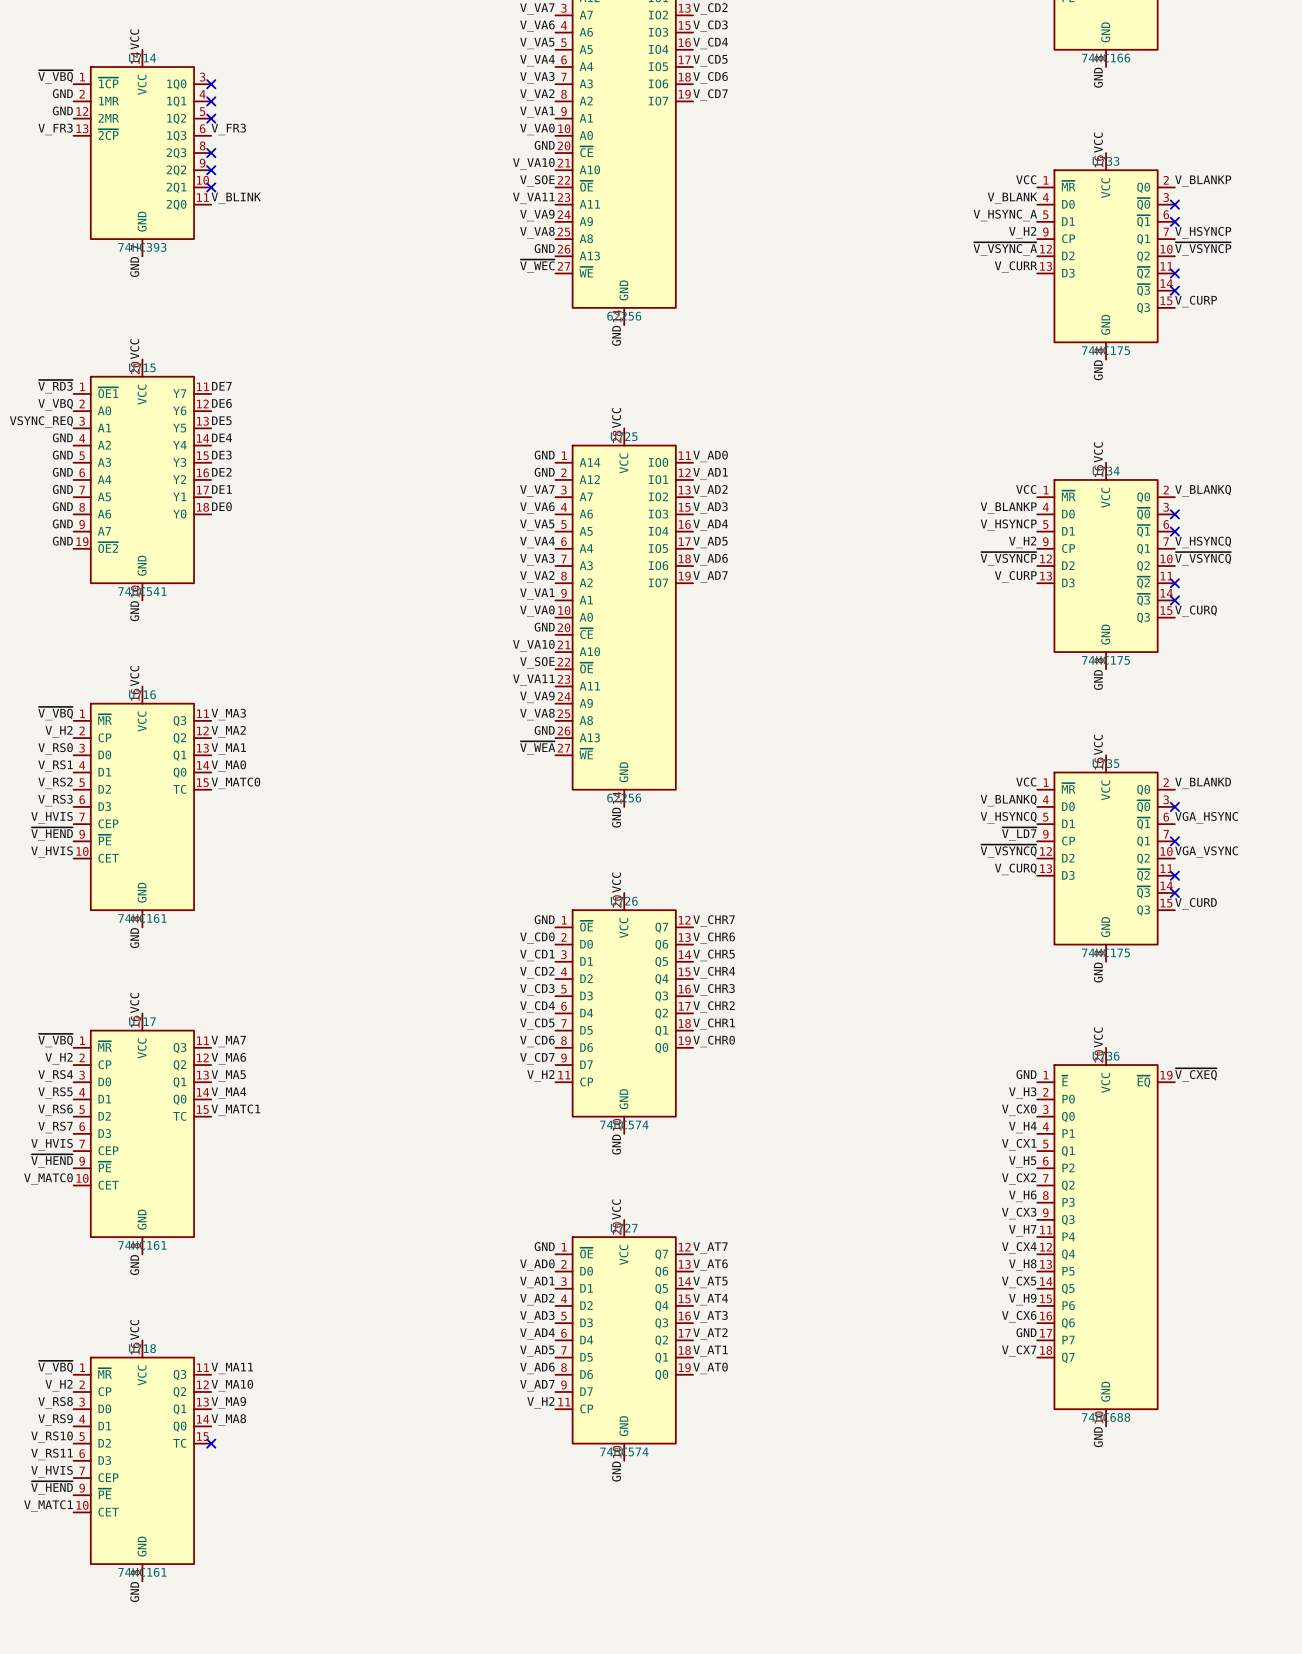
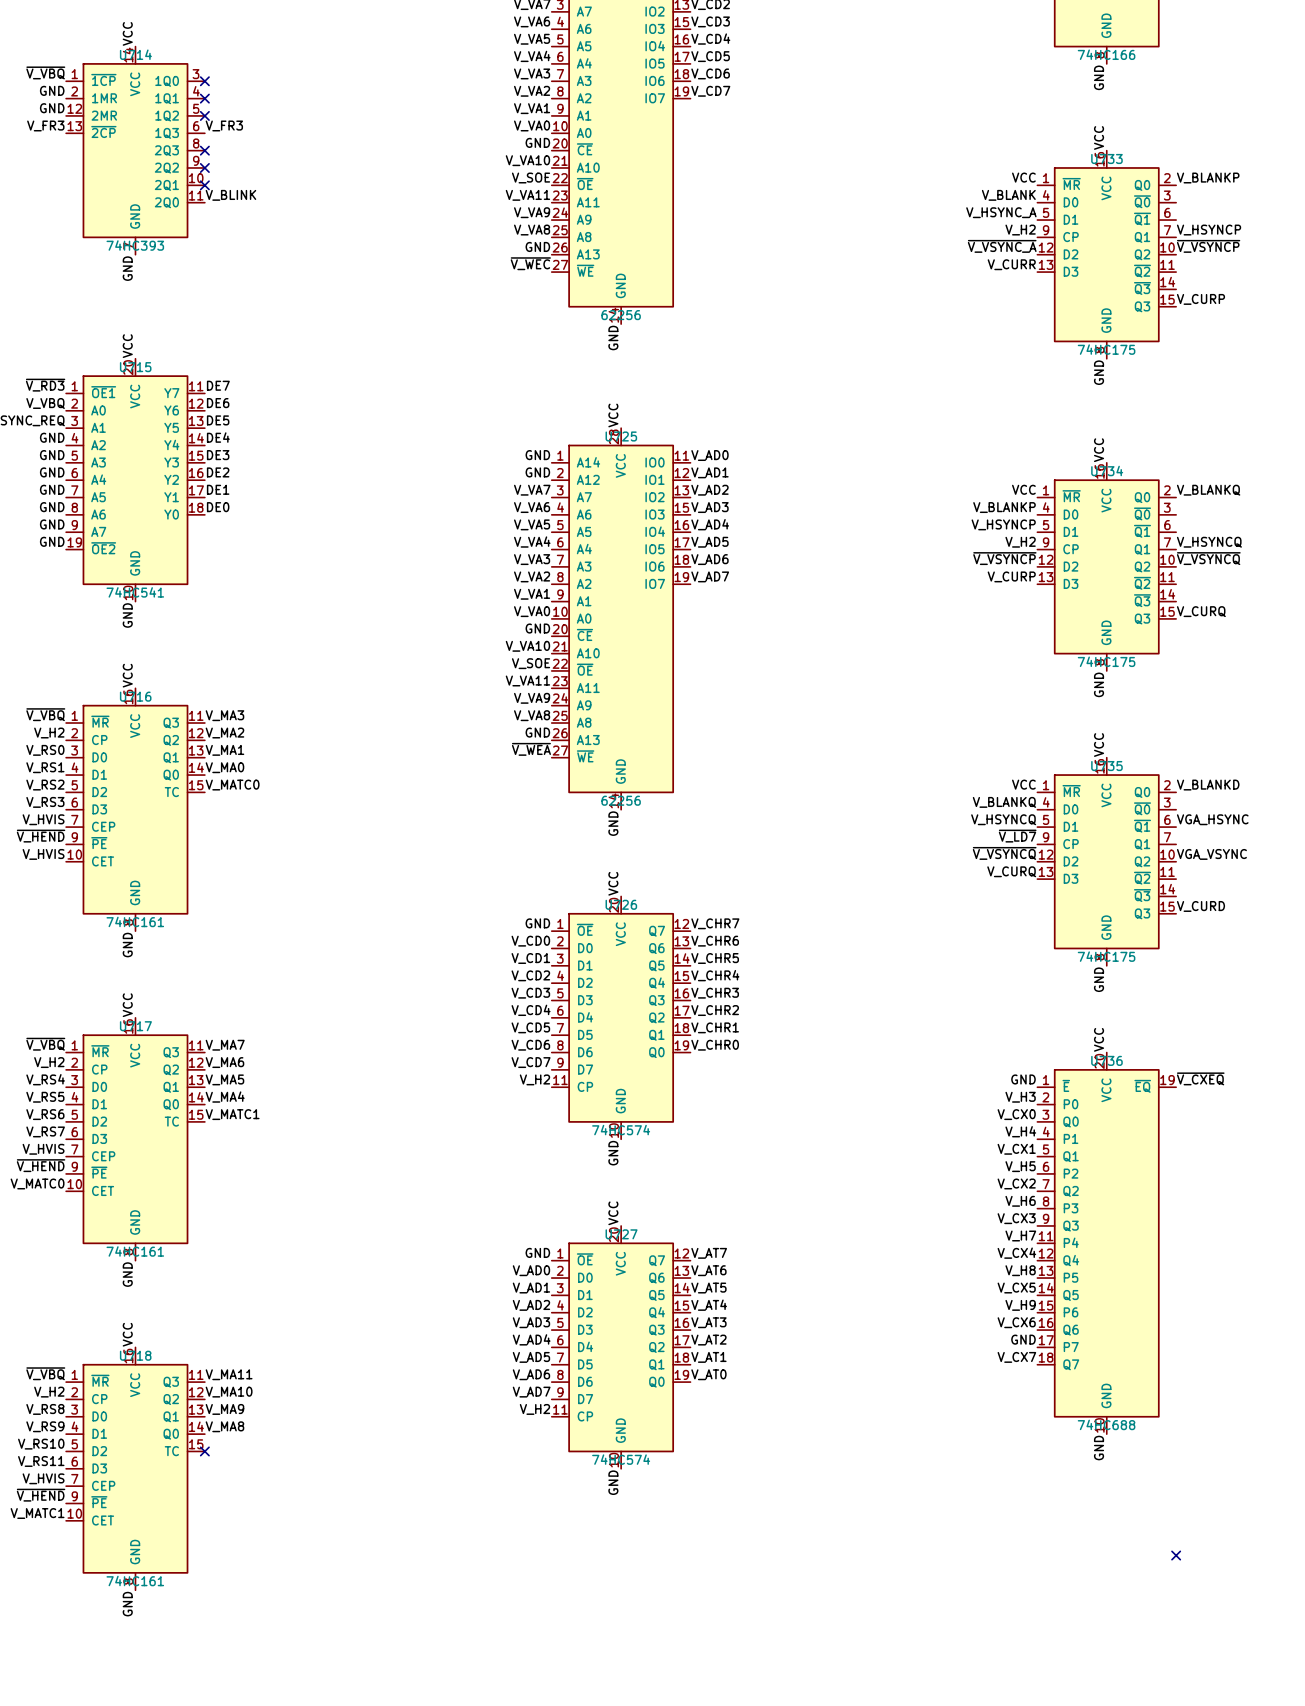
no-connect mark: (1174, 204) -> none
no-connect mark: (1174, 221) -> none
no-connect mark: (1174, 273) -> none
no-connect mark: (1174, 290) -> none
no-connect mark: (1174, 514) -> none
no-connect mark: (1174, 531) -> none
no-connect mark: (1174, 583) -> none
no-connect mark: (1174, 600) -> none
no-connect mark: (1174, 806) -> none
no-connect mark: (1174, 841) -> none
no-connect mark: (1174, 875) -> none
no-connect mark: (1174, 892) -> none
no-connect mark: none -> (1176, 1555)

